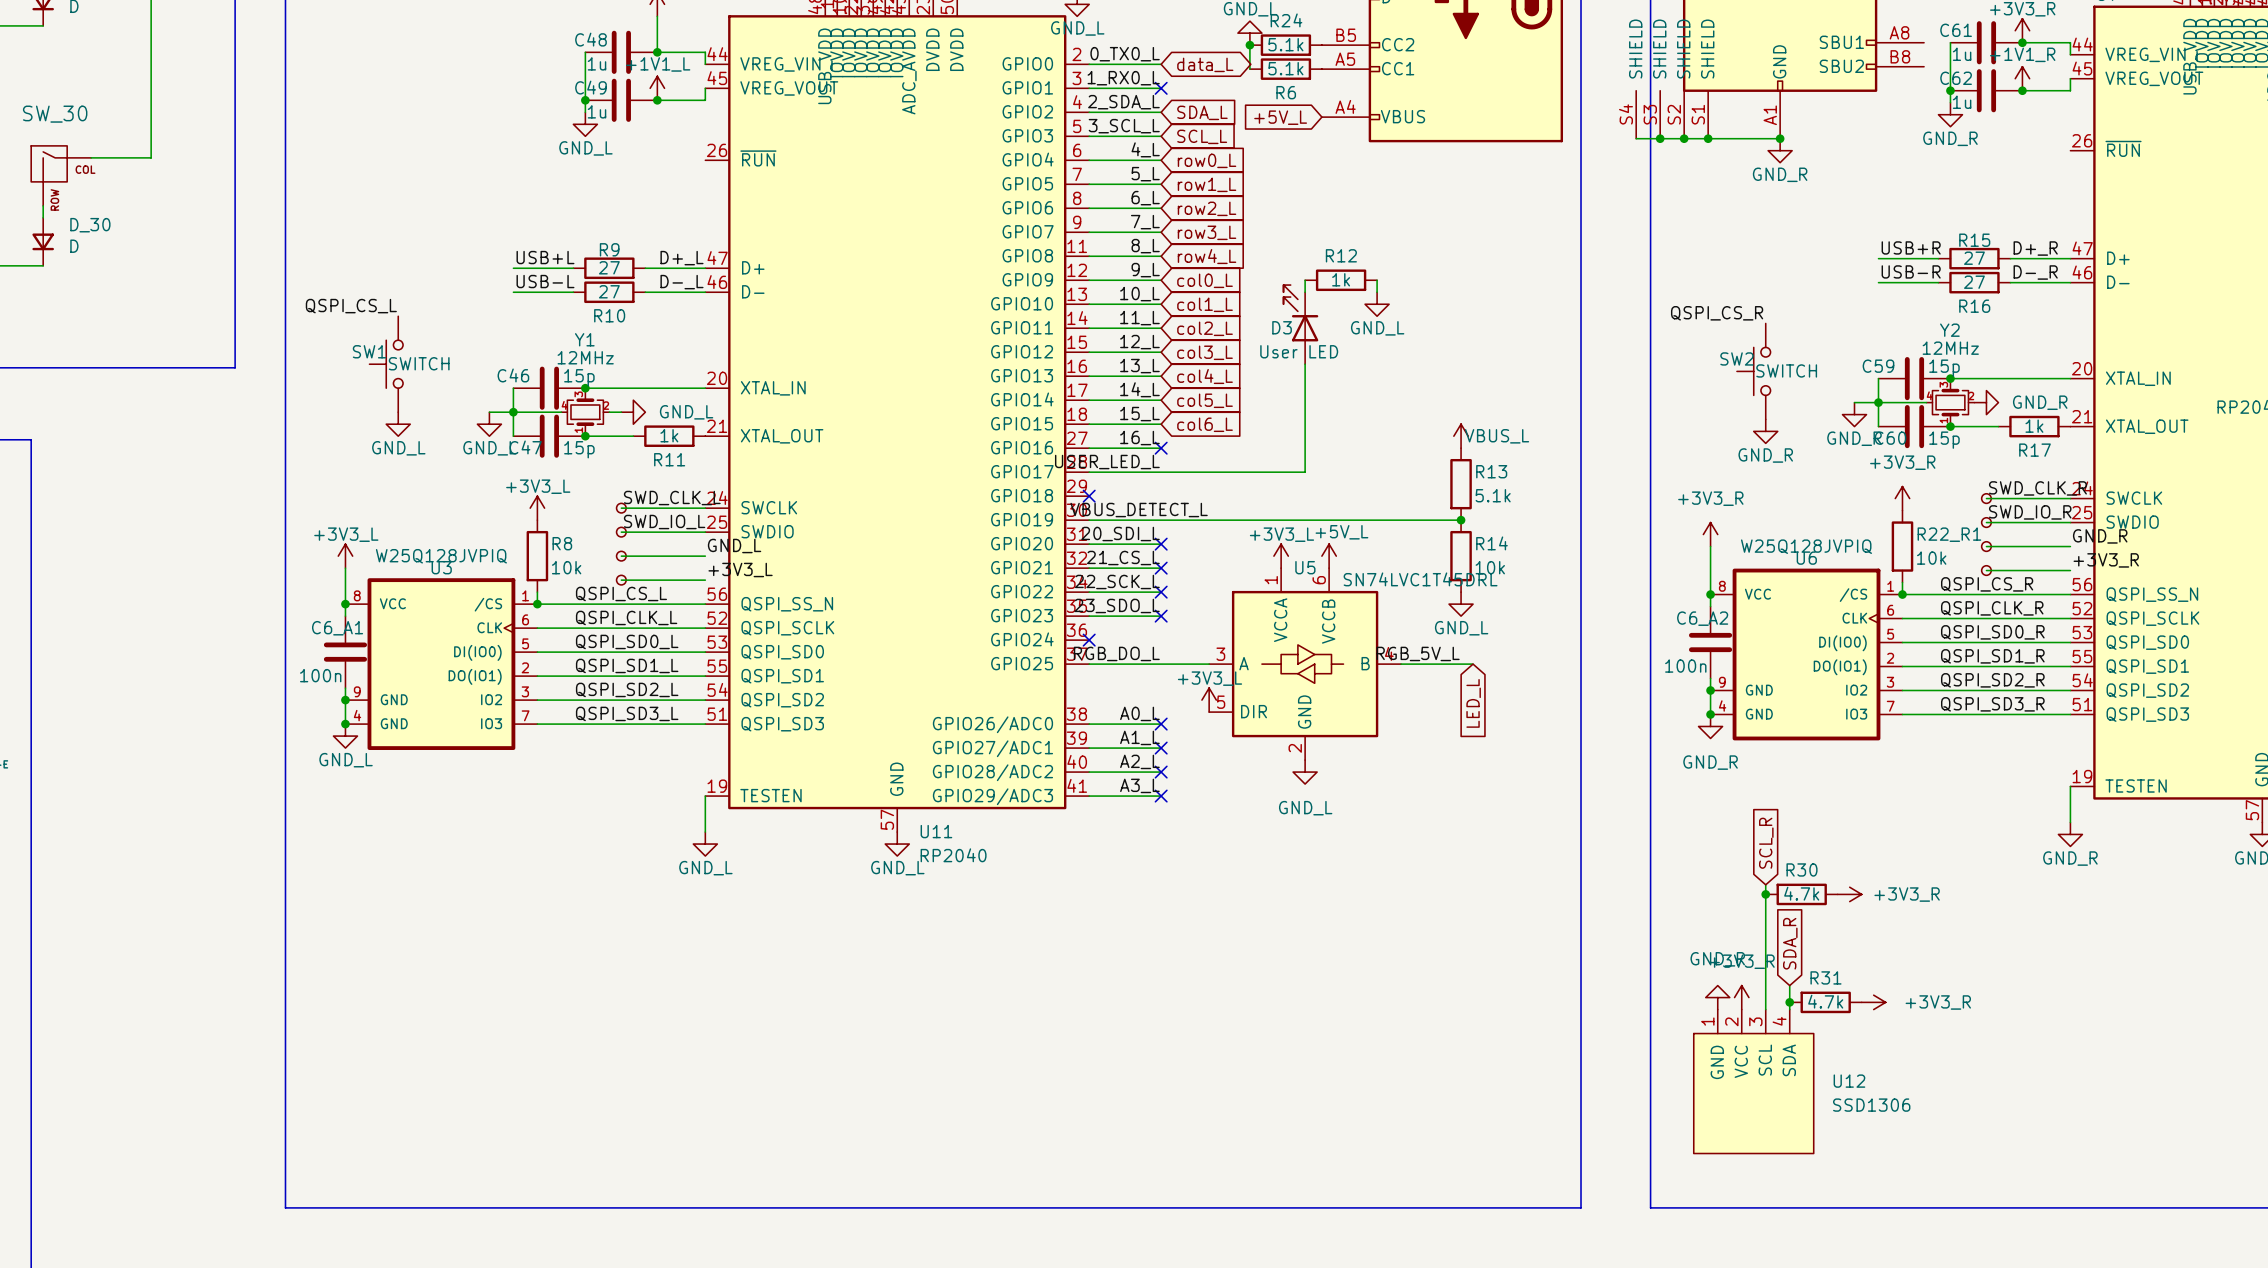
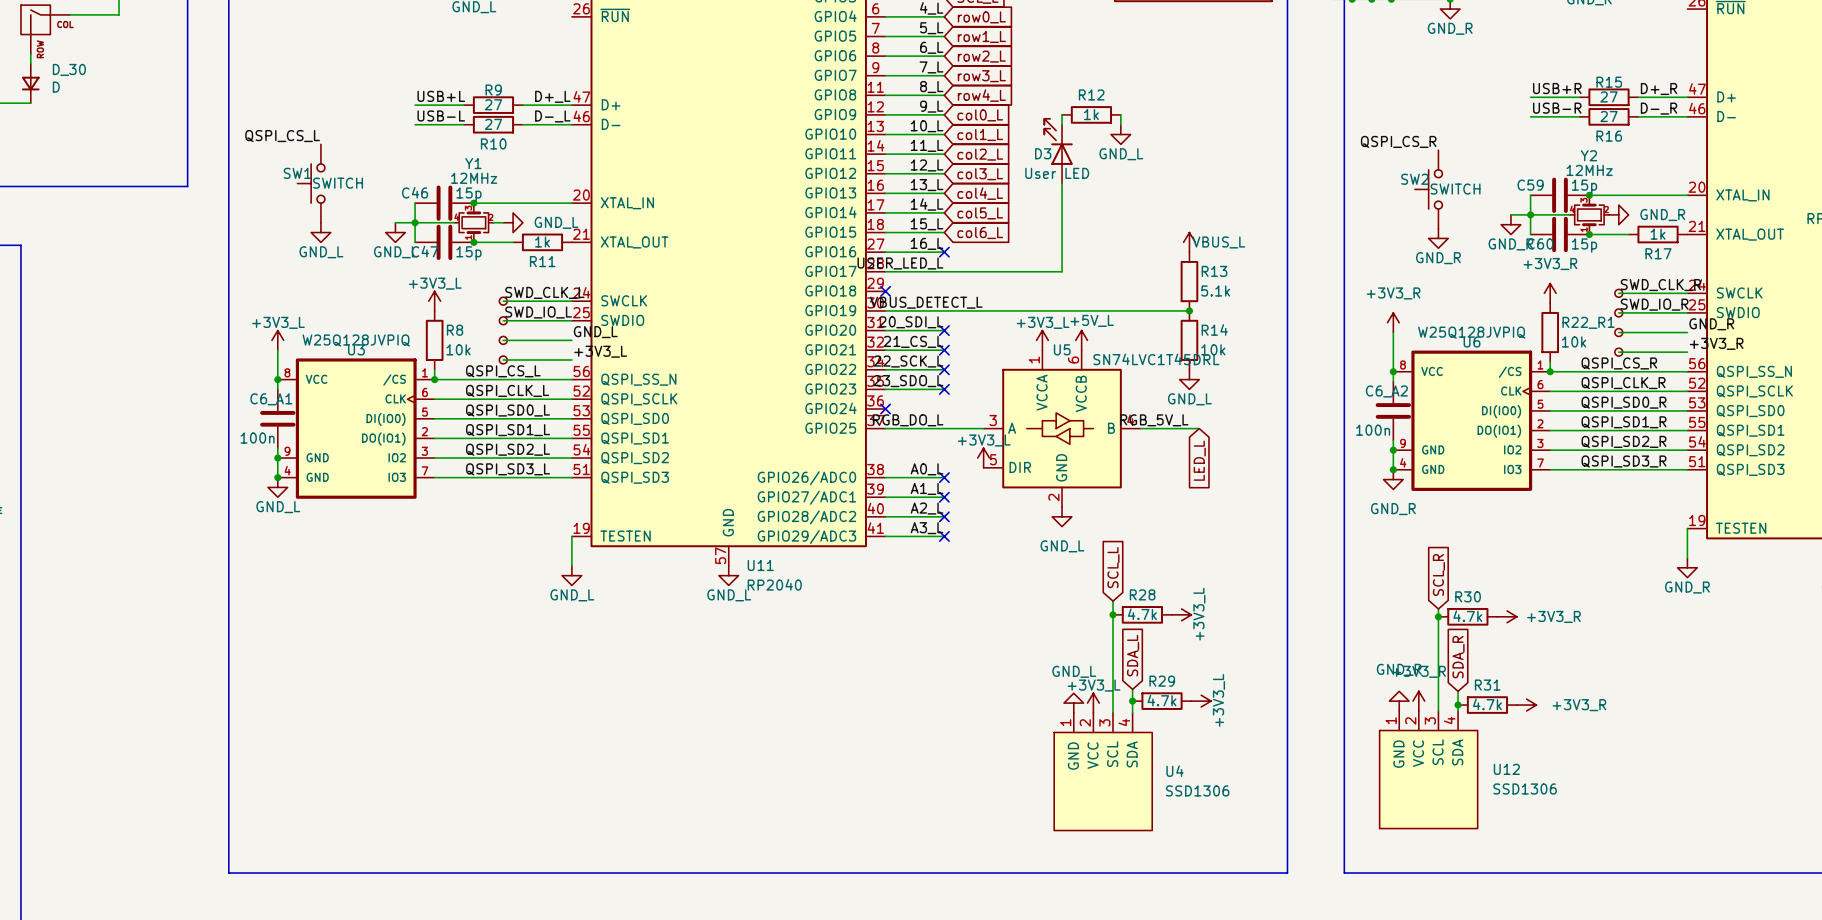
global label: none -> SCL_L (1113, 567)
wire: none -> (1112, 601) (1112, 712)
junction: none -> (1112, 614)
R28: none -> 4.7k (1142, 614)
power symbol: none -> +3V3_L (1181, 614)
global label: none -> SDA_L (1133, 655)
wire: none -> (1132, 689) (1132, 712)
junction: none -> (1132, 701)
R29: none -> 4.7k (1162, 701)
power symbol: none -> +3V3_L (1201, 701)
power symbol: none -> GND_L (1073, 703)
power symbol: none -> +3V3_L (1093, 703)
U4: none -> SSD1306 (1103, 771)

